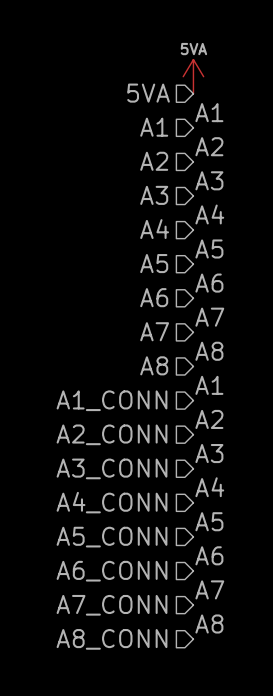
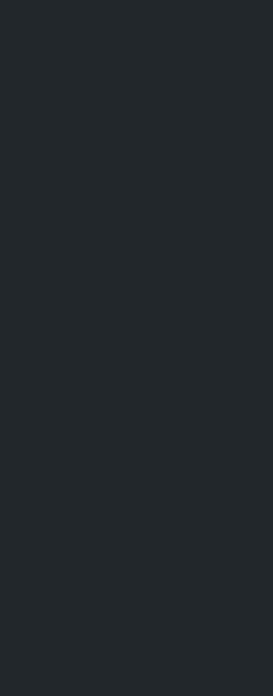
power symbol: 5VA (193, 76) -> none
hierarchical label: 5VA (148, 93) -> none
label: A1 (209, 112) -> none
hierarchical label: A1 (154, 127) -> none
label: A2 (209, 146) -> none
hierarchical label: A2 (154, 161) -> none
label: A3 (209, 180) -> none
hierarchical label: A3 (154, 195) -> none
label: A4 (209, 214) -> none
hierarchical label: A4 (154, 229) -> none
label: A5 (209, 248) -> none
hierarchical label: A5 (154, 263) -> none
label: A6 (209, 283) -> none
hierarchical label: A6 (154, 297) -> none
label: A7 (209, 317) -> none
hierarchical label: A7 (154, 331) -> none
label: A8 (209, 351) -> none
hierarchical label: A8 (154, 365) -> none
label: A1 (209, 385) -> none
hierarchical label: A1_CONN (112, 400) -> none
label: A2 (209, 419) -> none
hierarchical label: A2_CONN (112, 434) -> none
label: A3 (209, 453) -> none
hierarchical label: A3_CONN (112, 468) -> none
label: A4 (209, 487) -> none
hierarchical label: A4_CONN (112, 502) -> none
label: A5 (209, 521) -> none
hierarchical label: A5_CONN (112, 537) -> none
label: A6 (209, 555) -> none
hierarchical label: A6_CONN (112, 571) -> none
label: A7 (209, 589) -> none
hierarchical label: A7_CONN (112, 605) -> none
label: A8 (209, 623) -> none
hierarchical label: A8_CONN (112, 639) -> none

